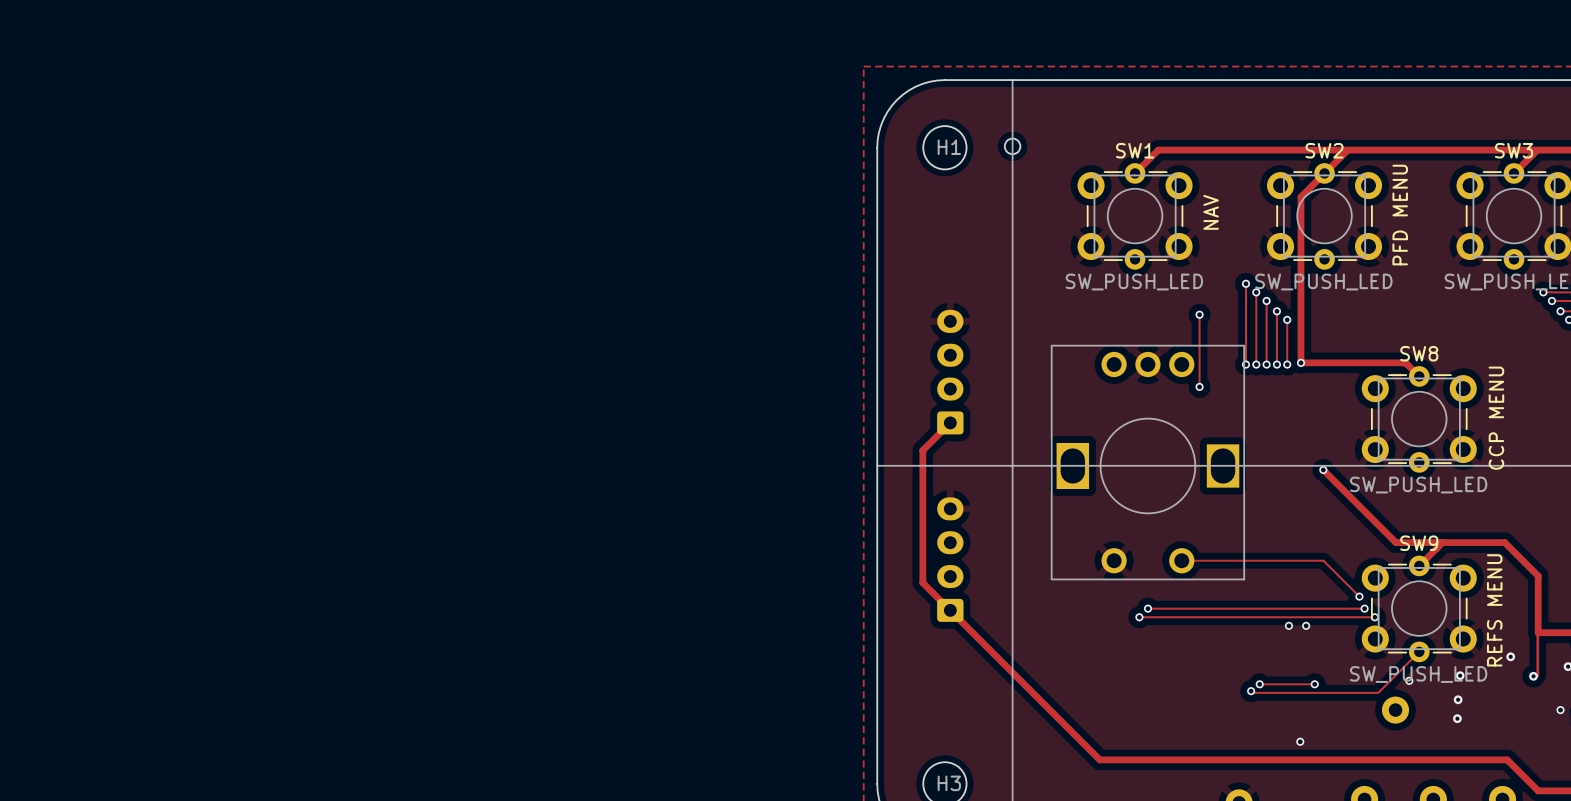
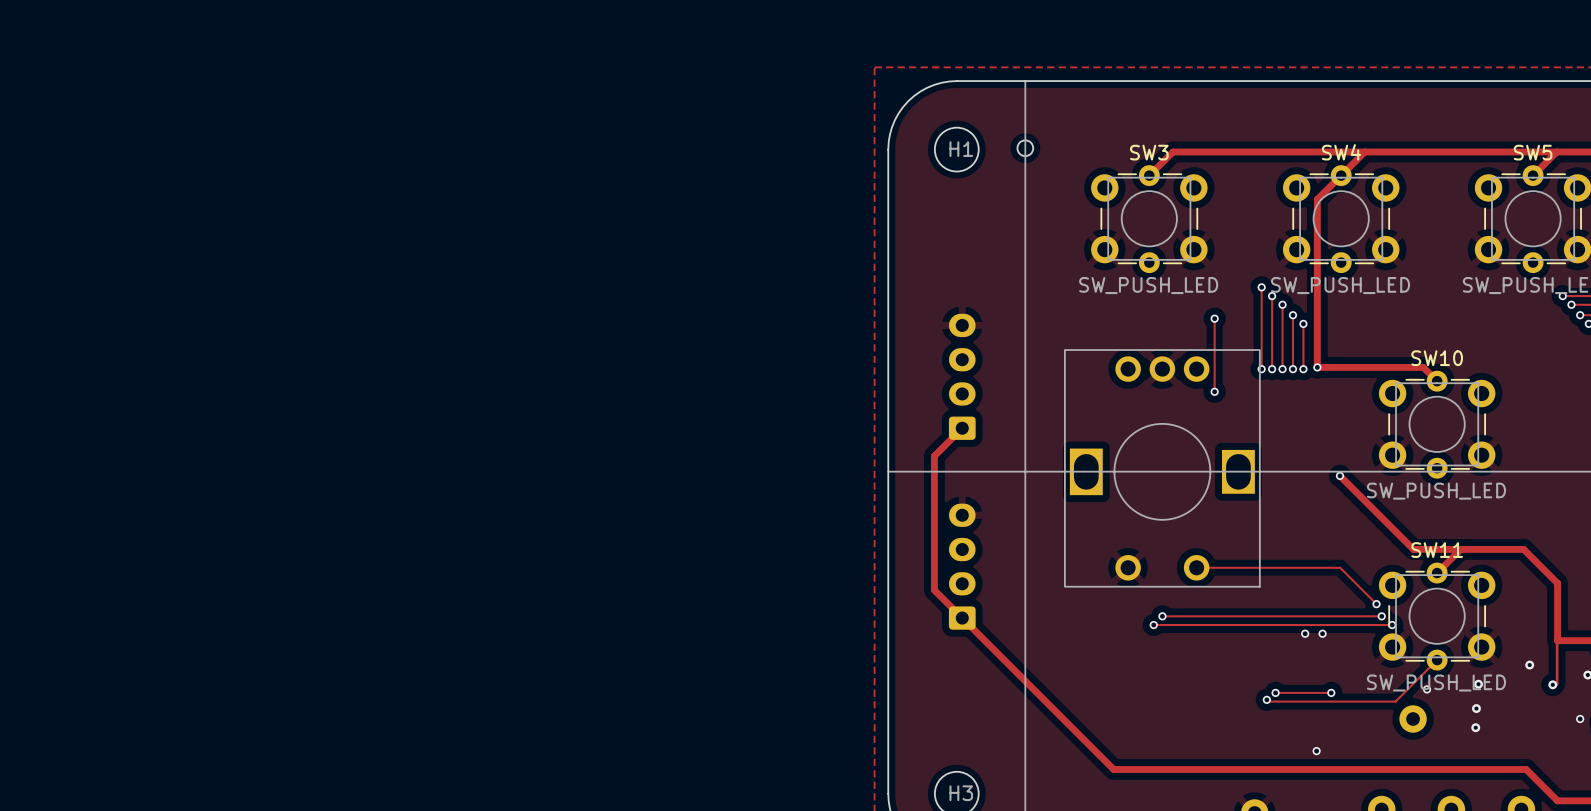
SW1 name: SW1 (1135, 150) -> SW3 (1149, 152)
SW2 name: SW2 (1324, 150) -> SW4 (1341, 152)
SW3 name: SW3 (1514, 150) -> SW5 (1533, 152)
text: NAV (1211, 212) -> none
text: PFD MENU (1400, 215) -> none
SW8 name: SW8 (1419, 353) -> SW10 (1437, 358)
text: CCP MENU (1496, 418) -> none
SW9 name: SW9 (1419, 543) -> SW11 (1437, 550)
text: REFS MENU (1494, 610) -> none

